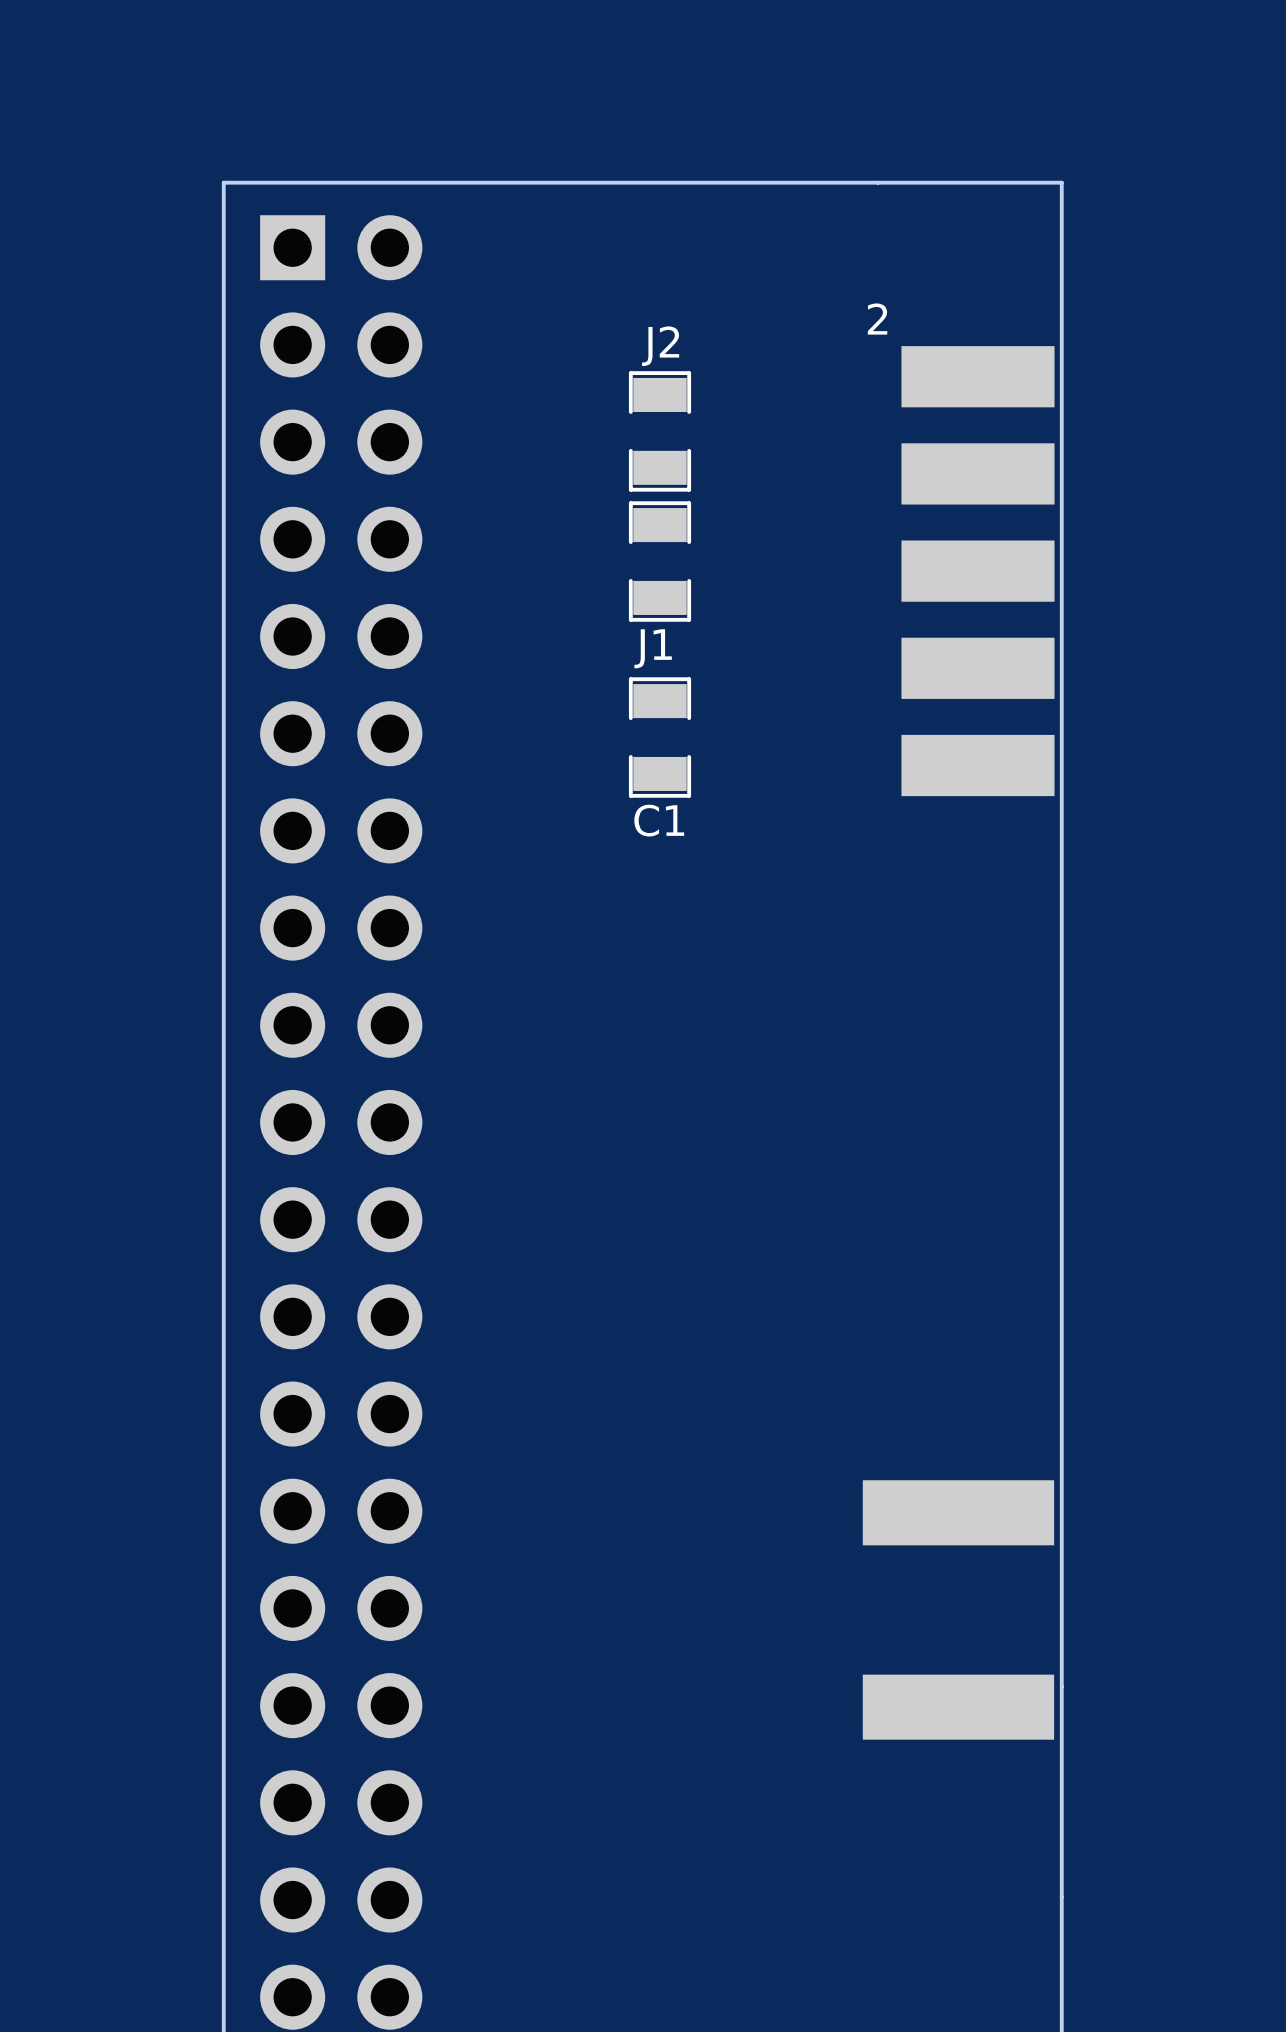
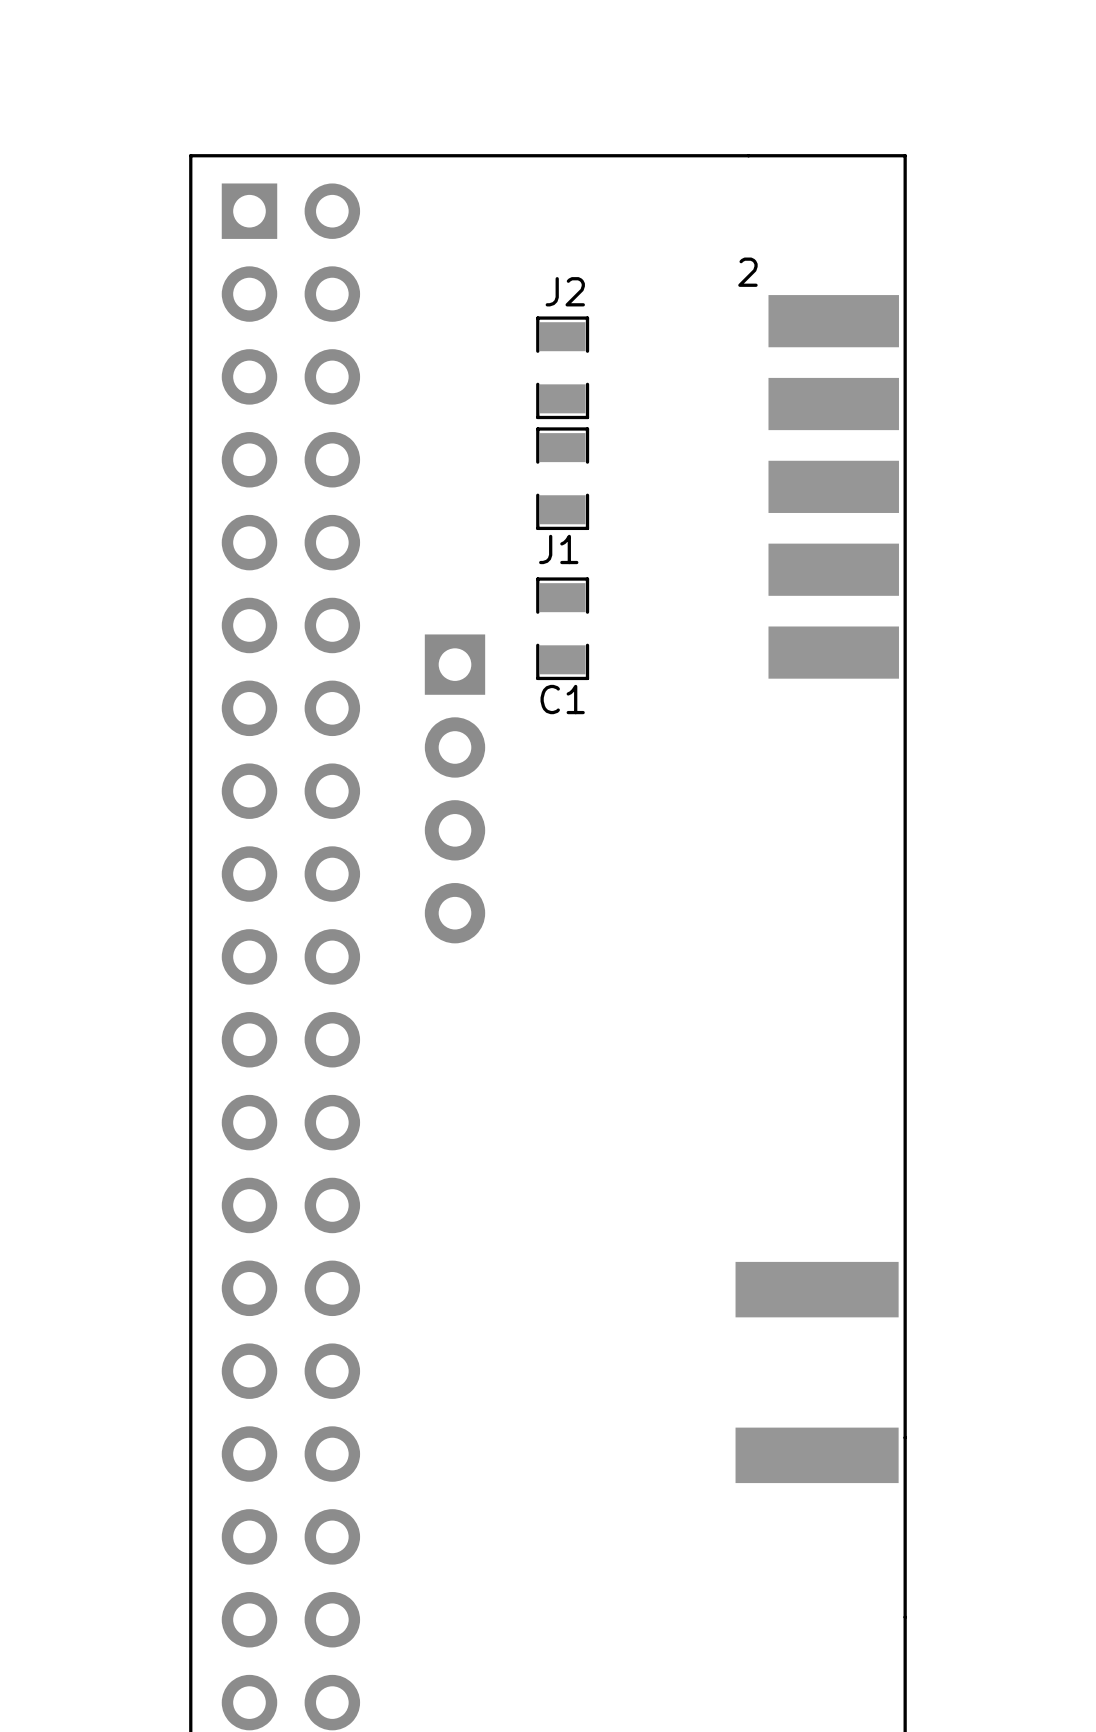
part: none -> (454, 788)

